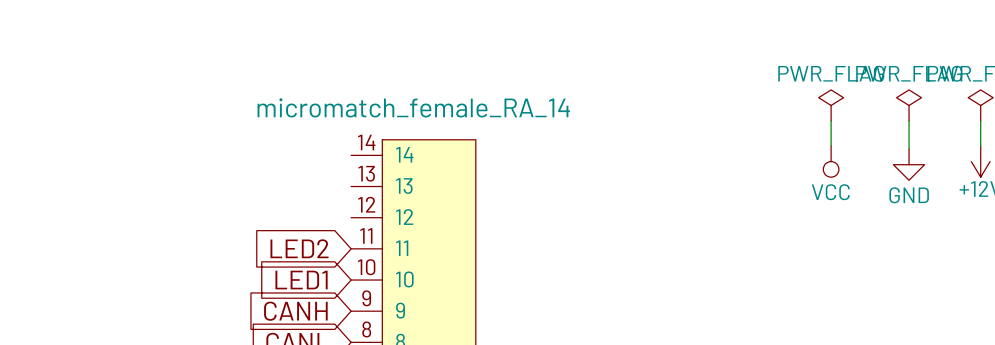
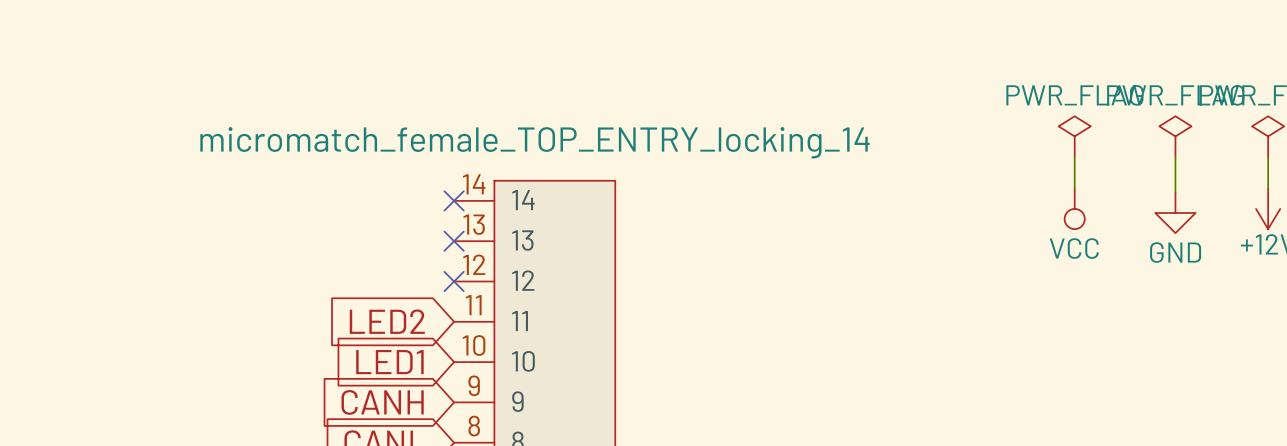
part value: micromatch_female_RA_14 (413, 107) -> micromatch_female_TOP_ENTRY_locking_14 (535, 142)
no-connect mark: none -> (454, 200)
no-connect mark: none -> (454, 241)
no-connect mark: none -> (454, 281)

